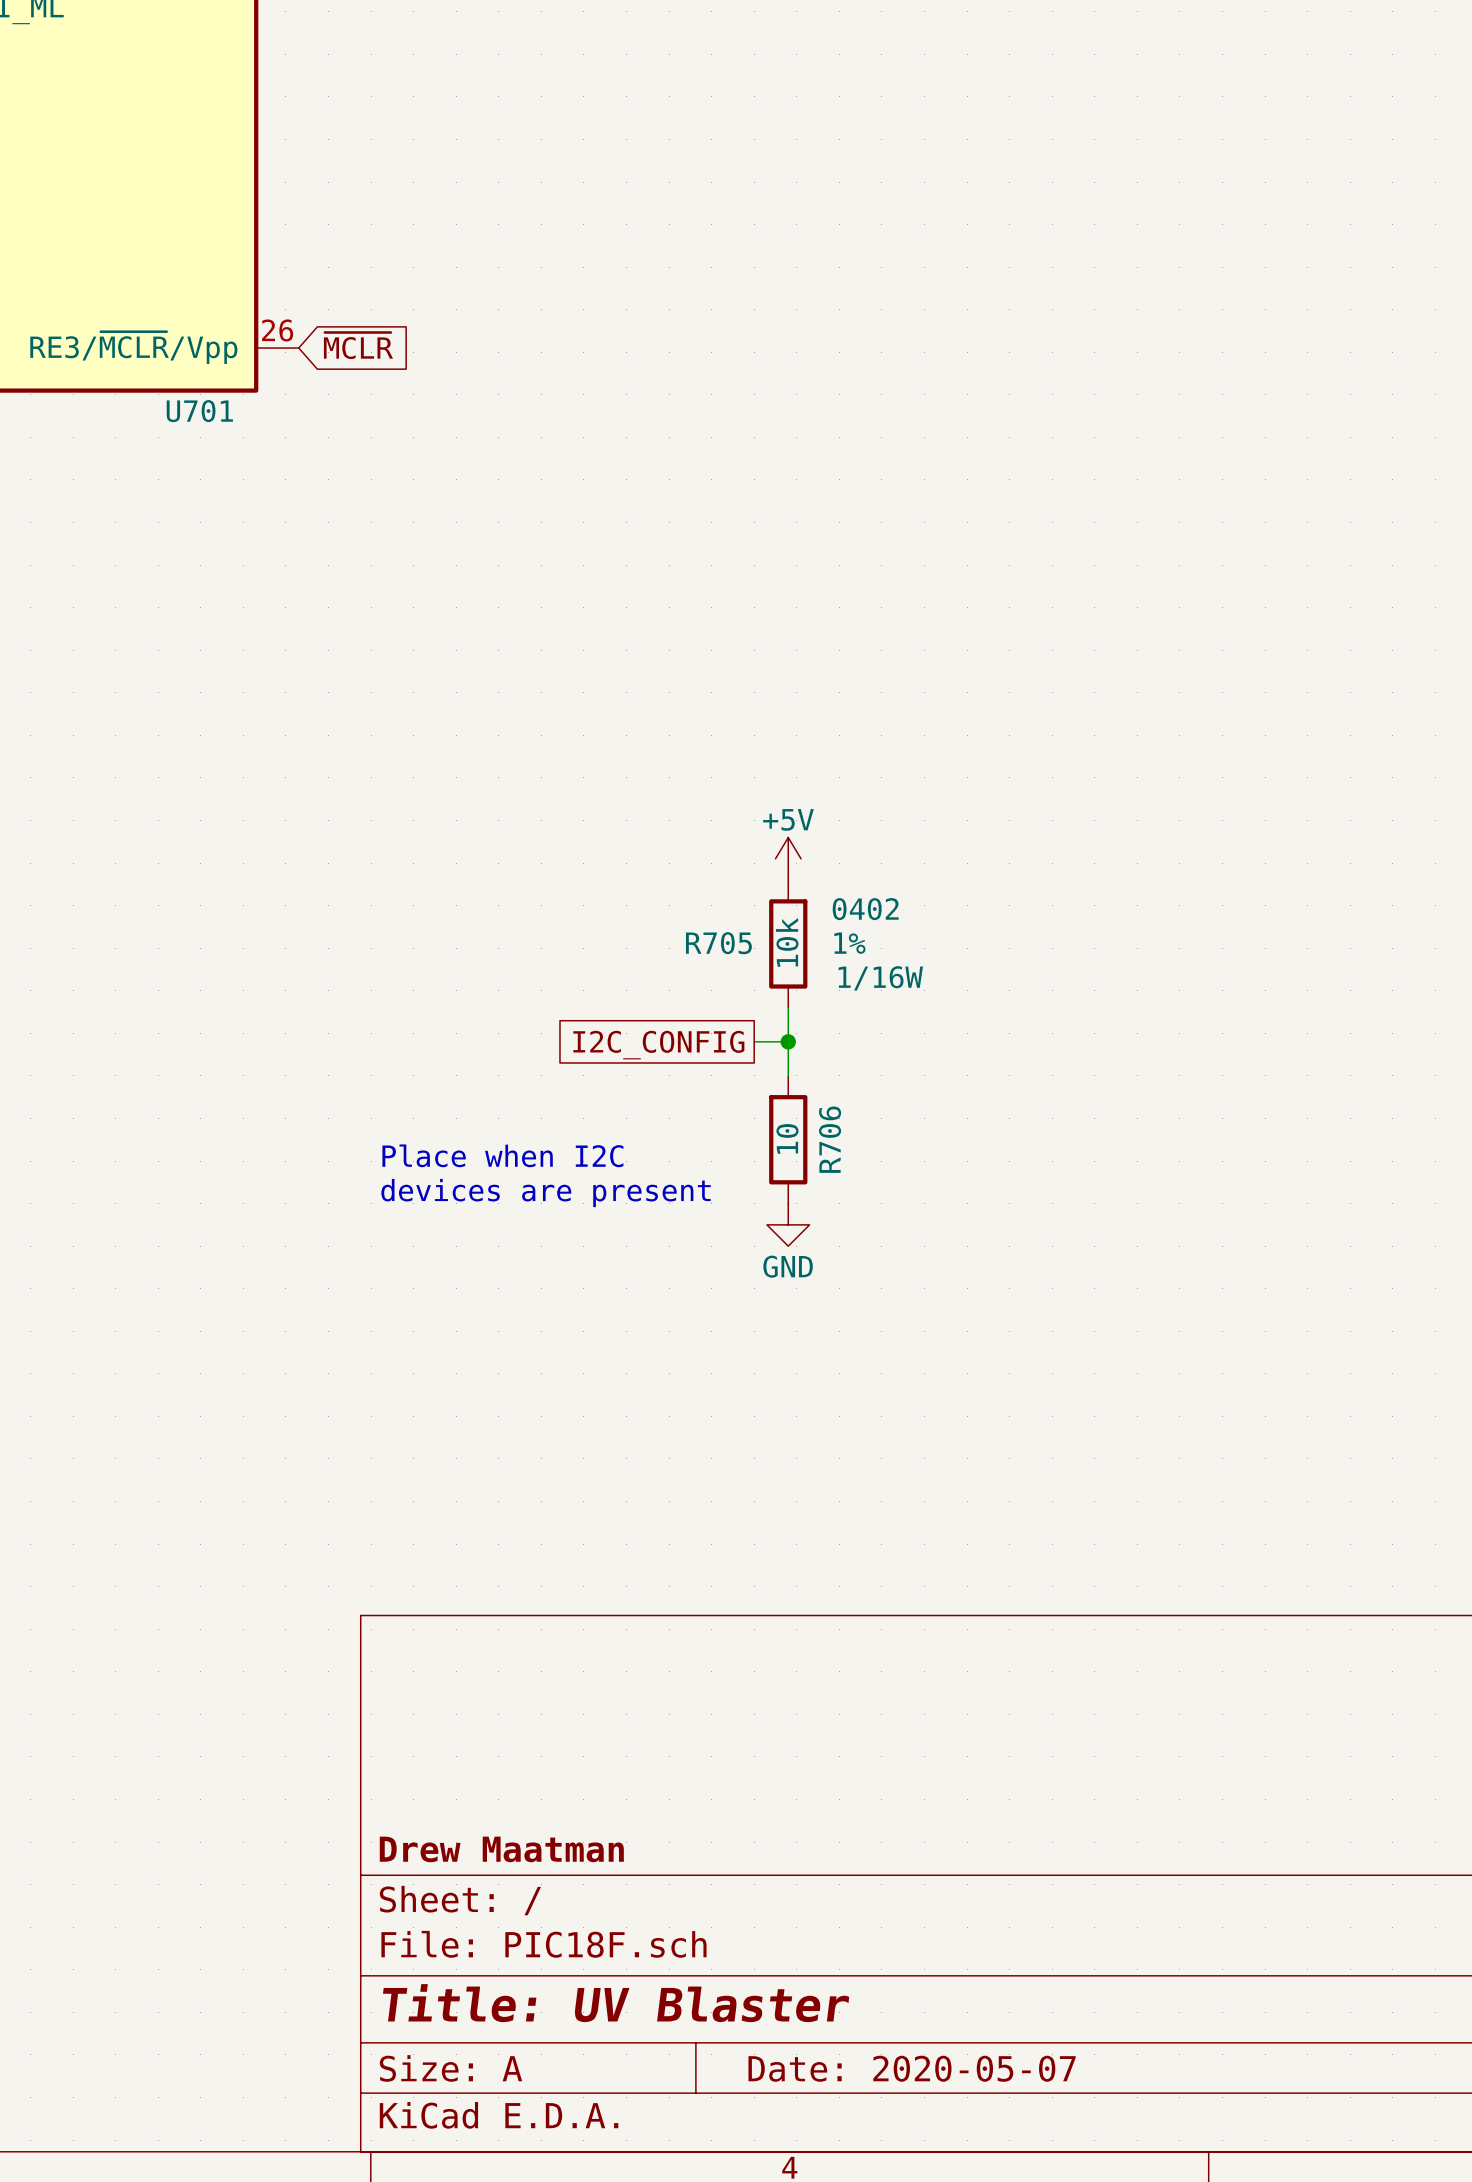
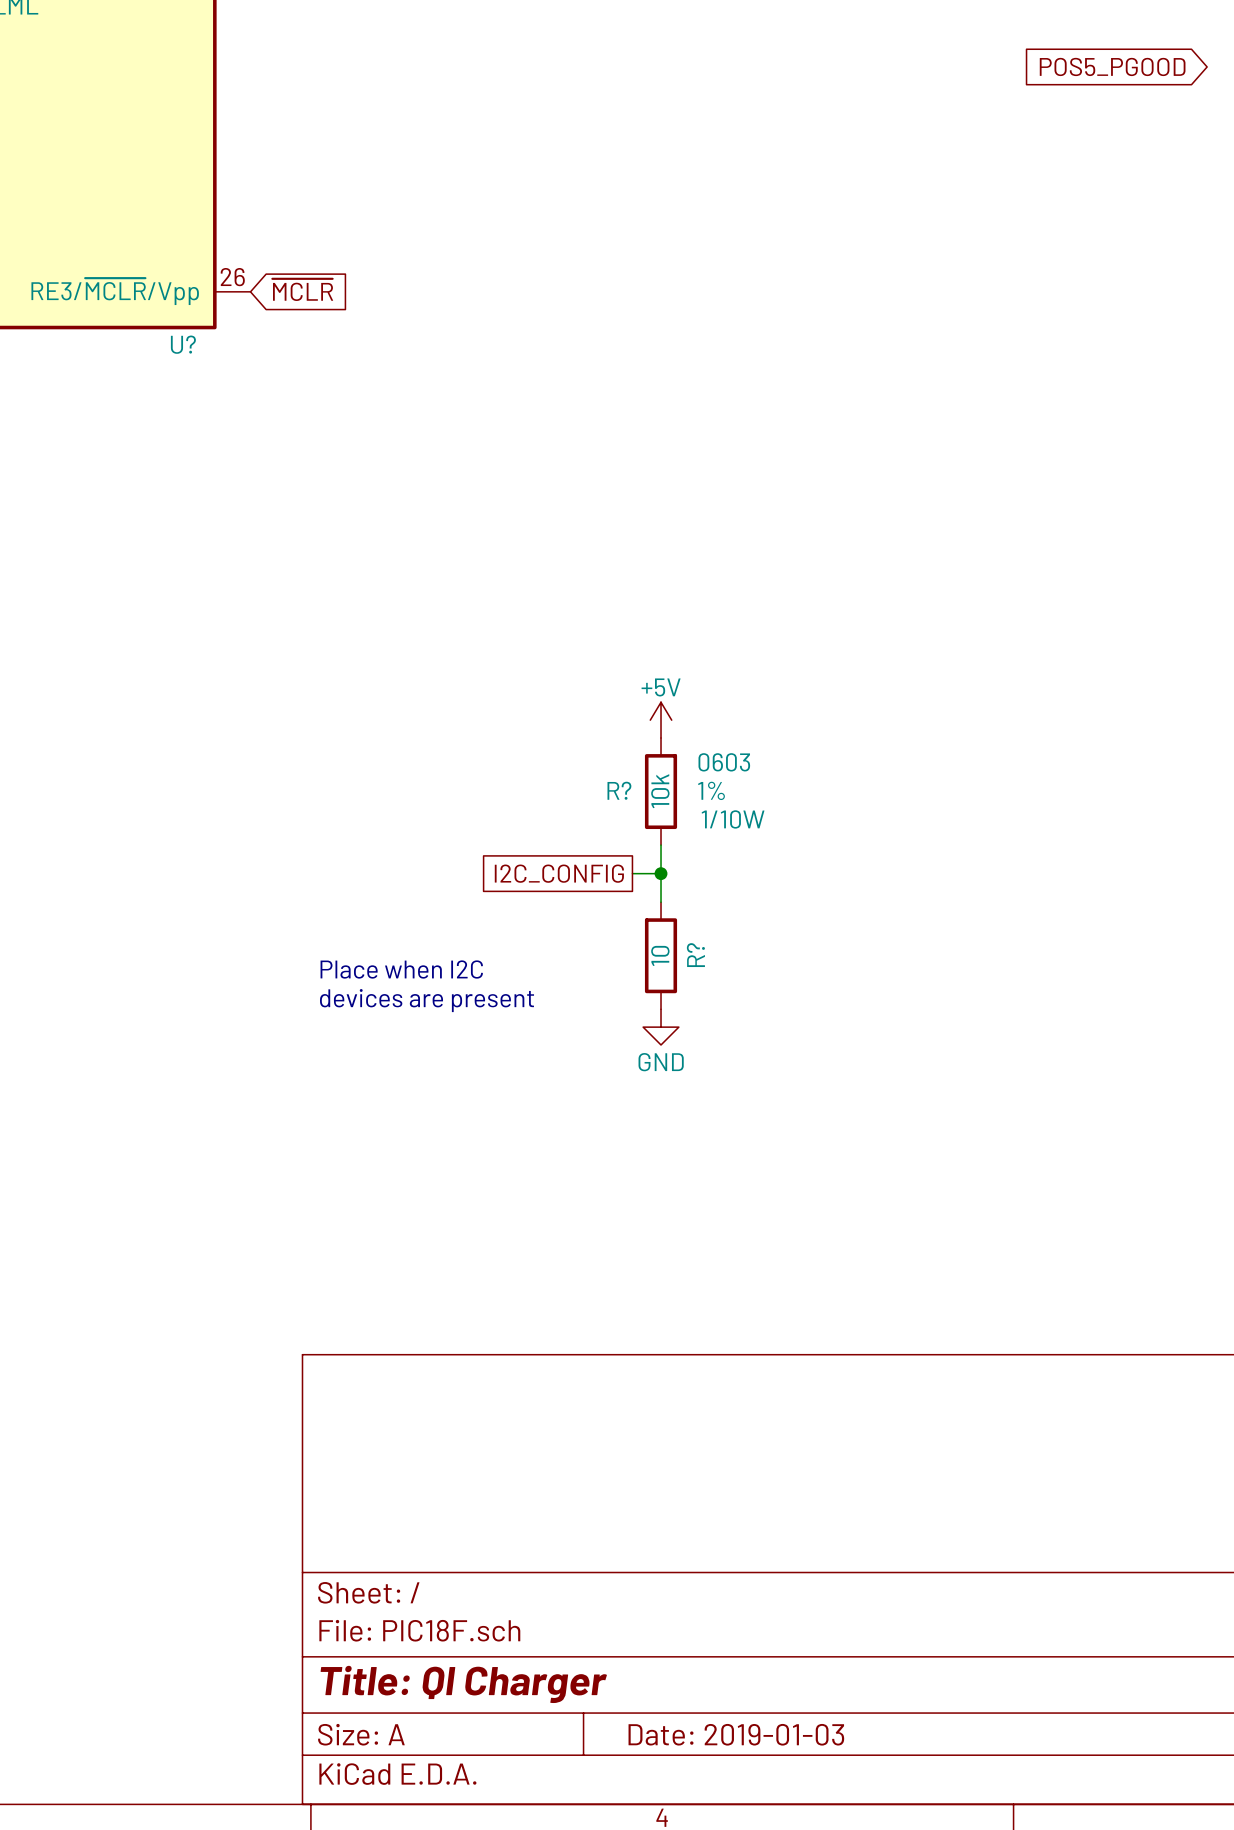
global label: none -> POS5_PGOOD (1112, 66)
U701 name: U701 (199, 411) -> U? (183, 344)
R705 text: 0402 (865, 909) -> 0603 (724, 762)
R705 name: R705 (718, 943) -> R? (619, 790)
R705 text: 1/16W (880, 978) -> 1/10W (733, 819)
R706 name: R706 (830, 1139) -> R? (695, 955)
title block: Drew Maatman (501, 1849) -> none
title block: Title: UV Blaster (616, 2003) -> Title: QI Charger (463, 1684)
title block: Date: 2020-05-07 (912, 2068) -> Date: 2019-01-03 (736, 1734)

